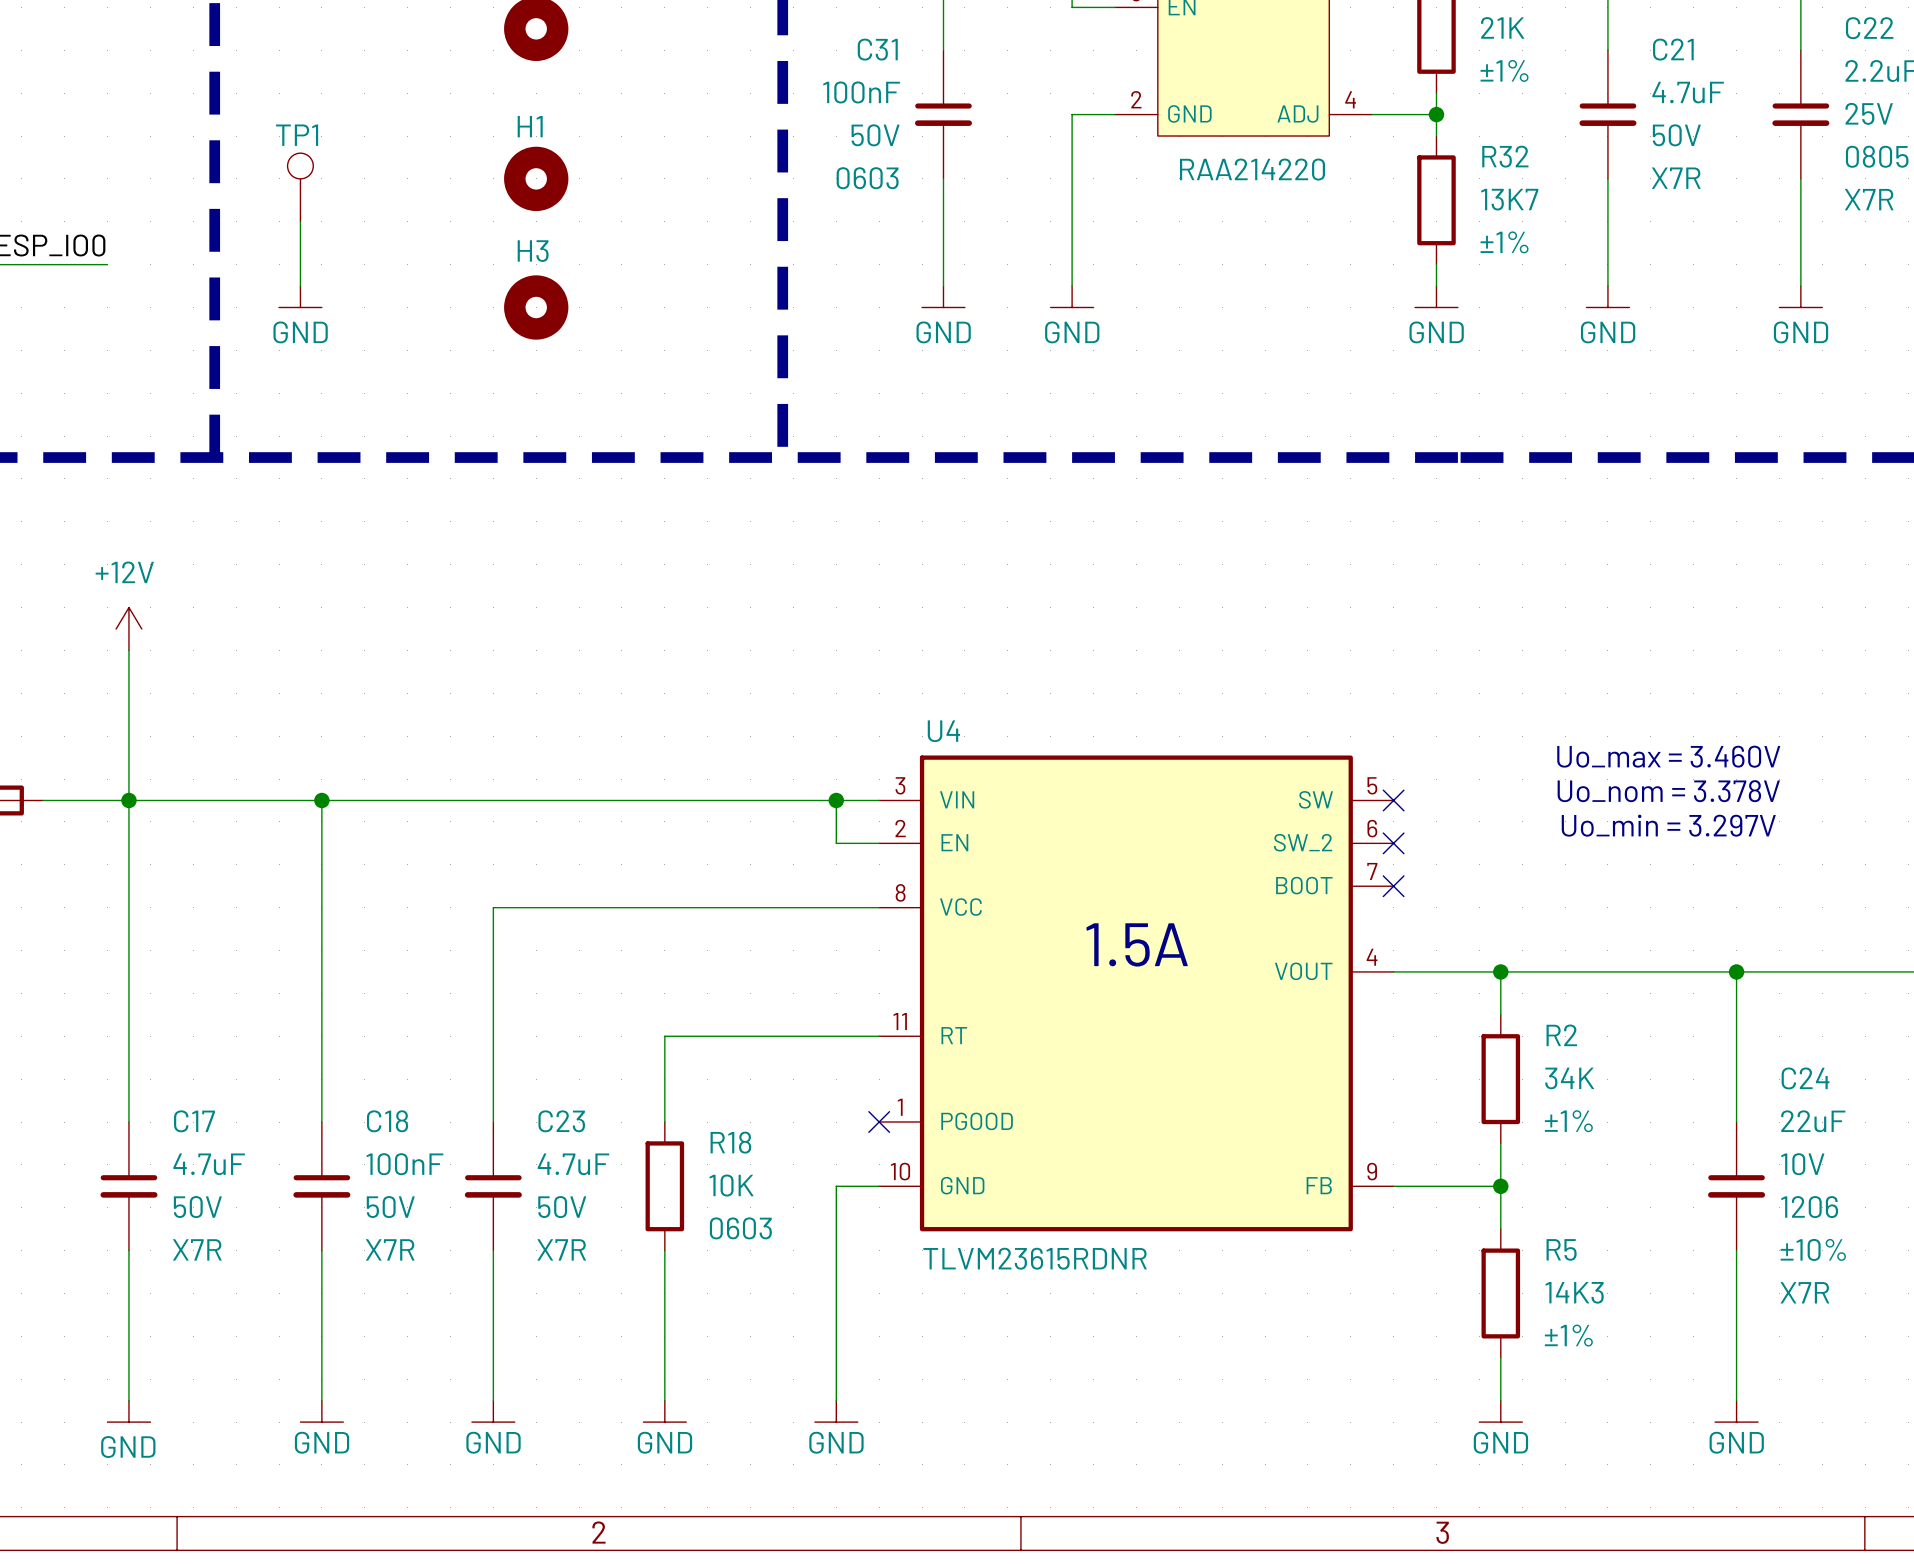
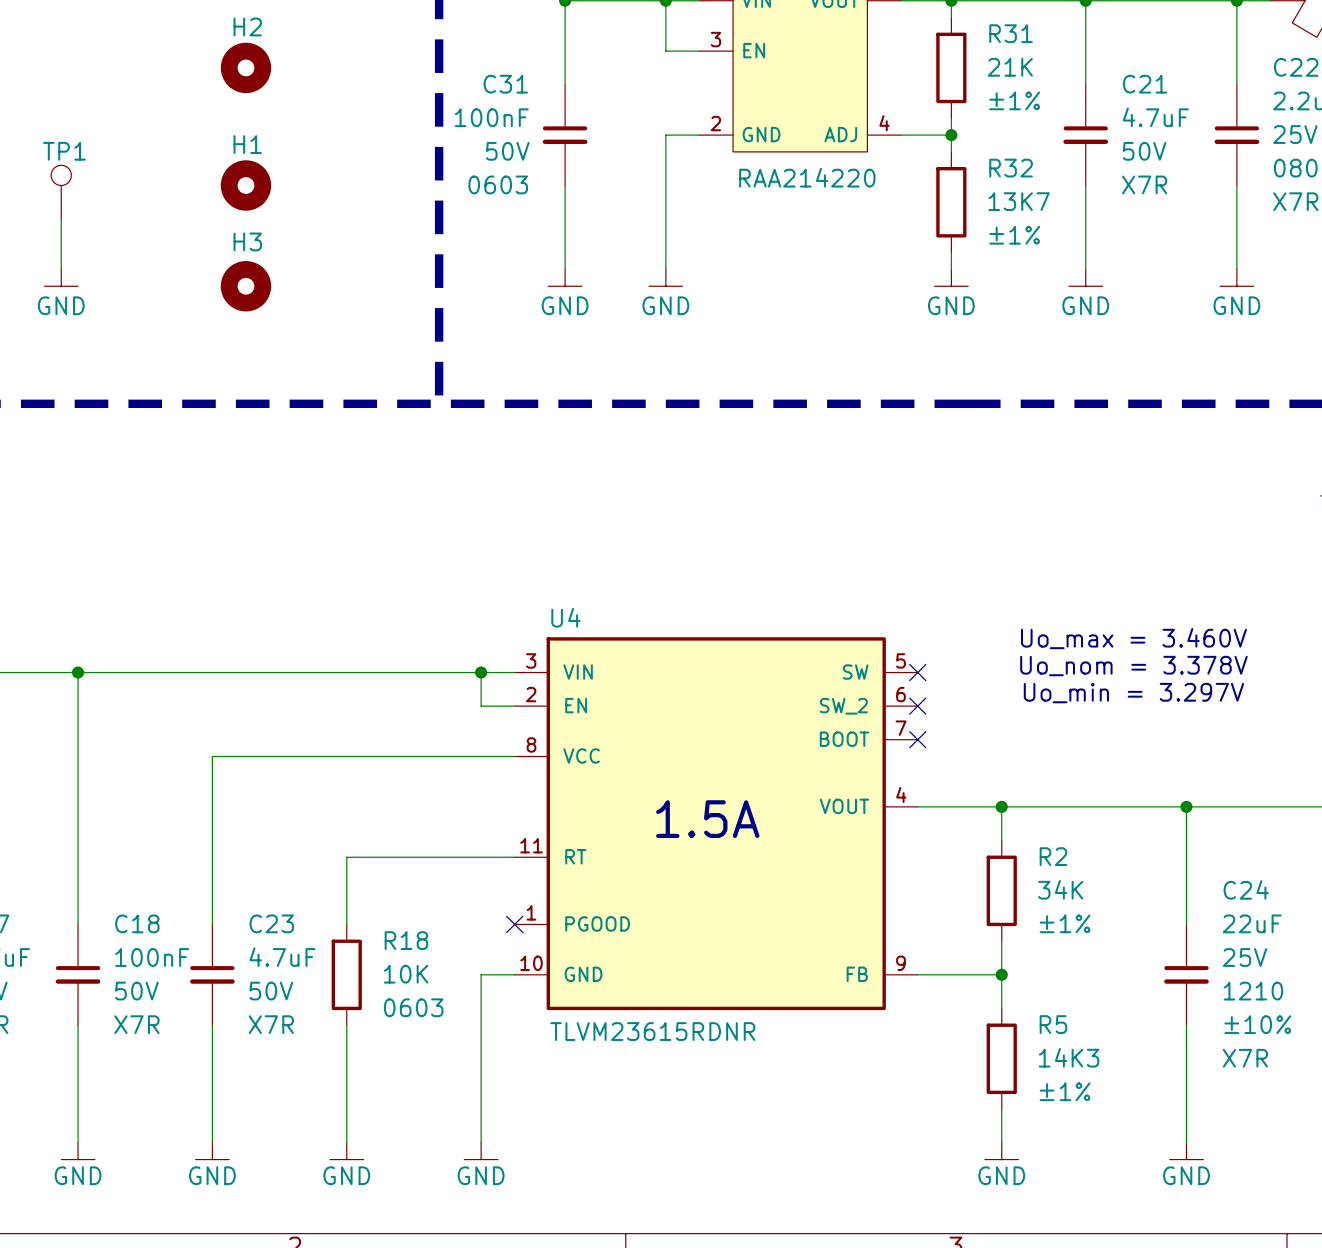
text position: 1.5A (1137, 944) -> 1.5A (707, 819)
C24 text: 10V (1802, 1164) -> 25V (1245, 957)
C24 text: 1206 (1809, 1207) -> 1210 (1253, 991)

